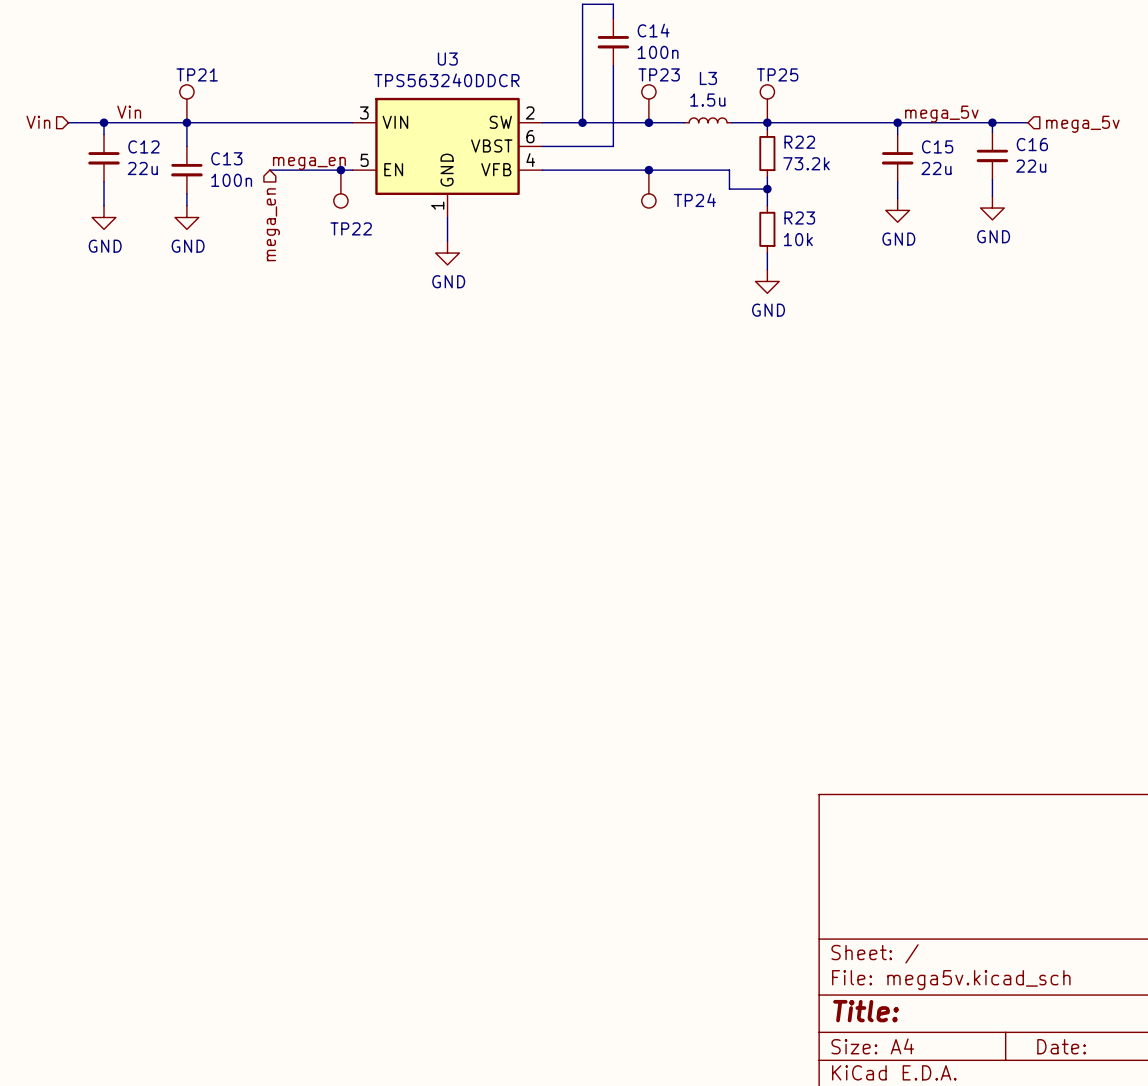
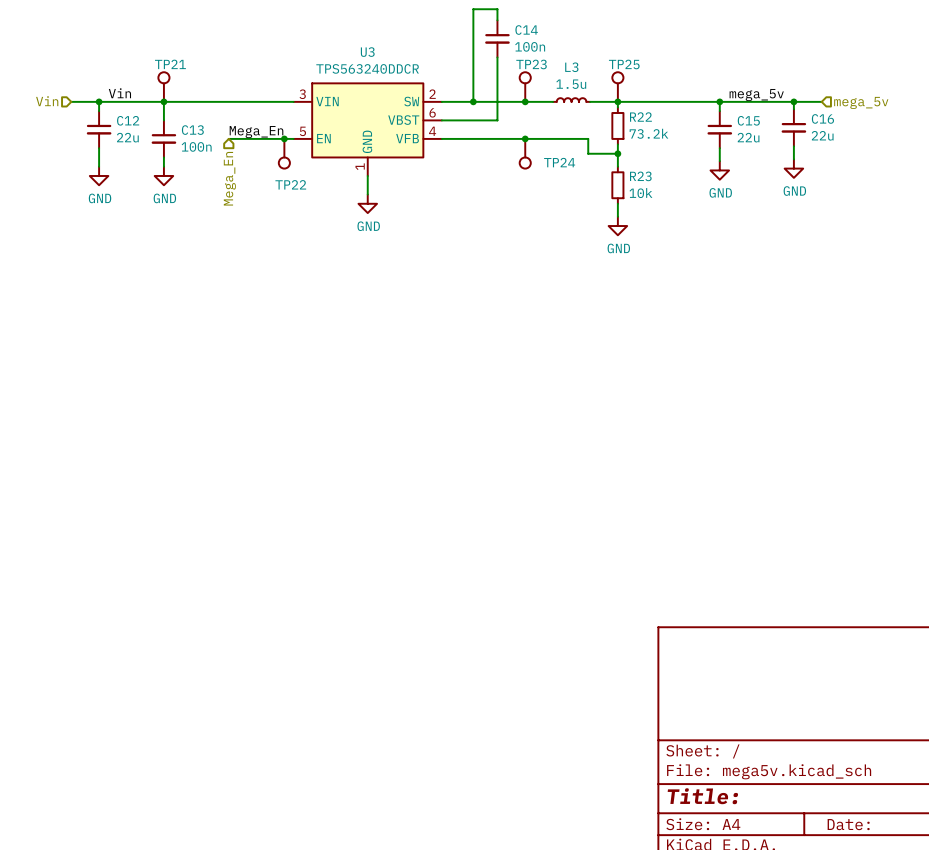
label: mega_en (309, 163) -> Mega_En (256, 132)
hierarchical label: mega_en (273, 224) -> Mega_En (229, 178)

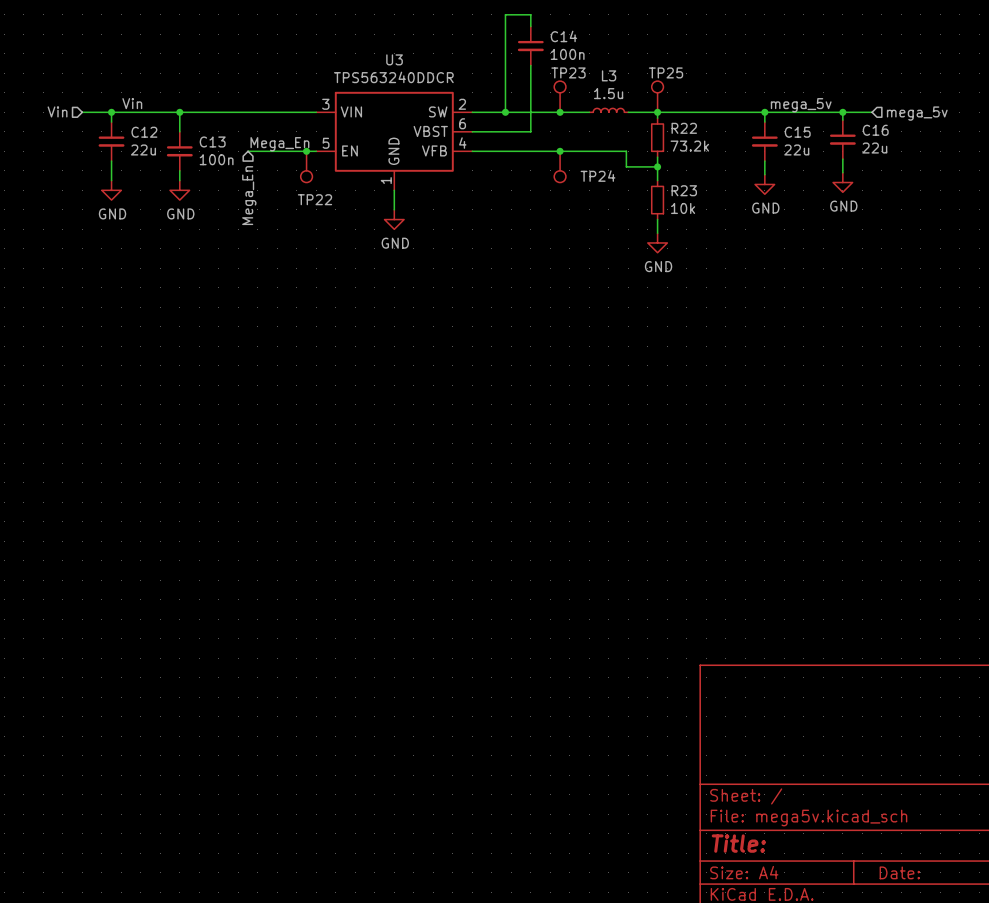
TP21: (163, 87) -> none

